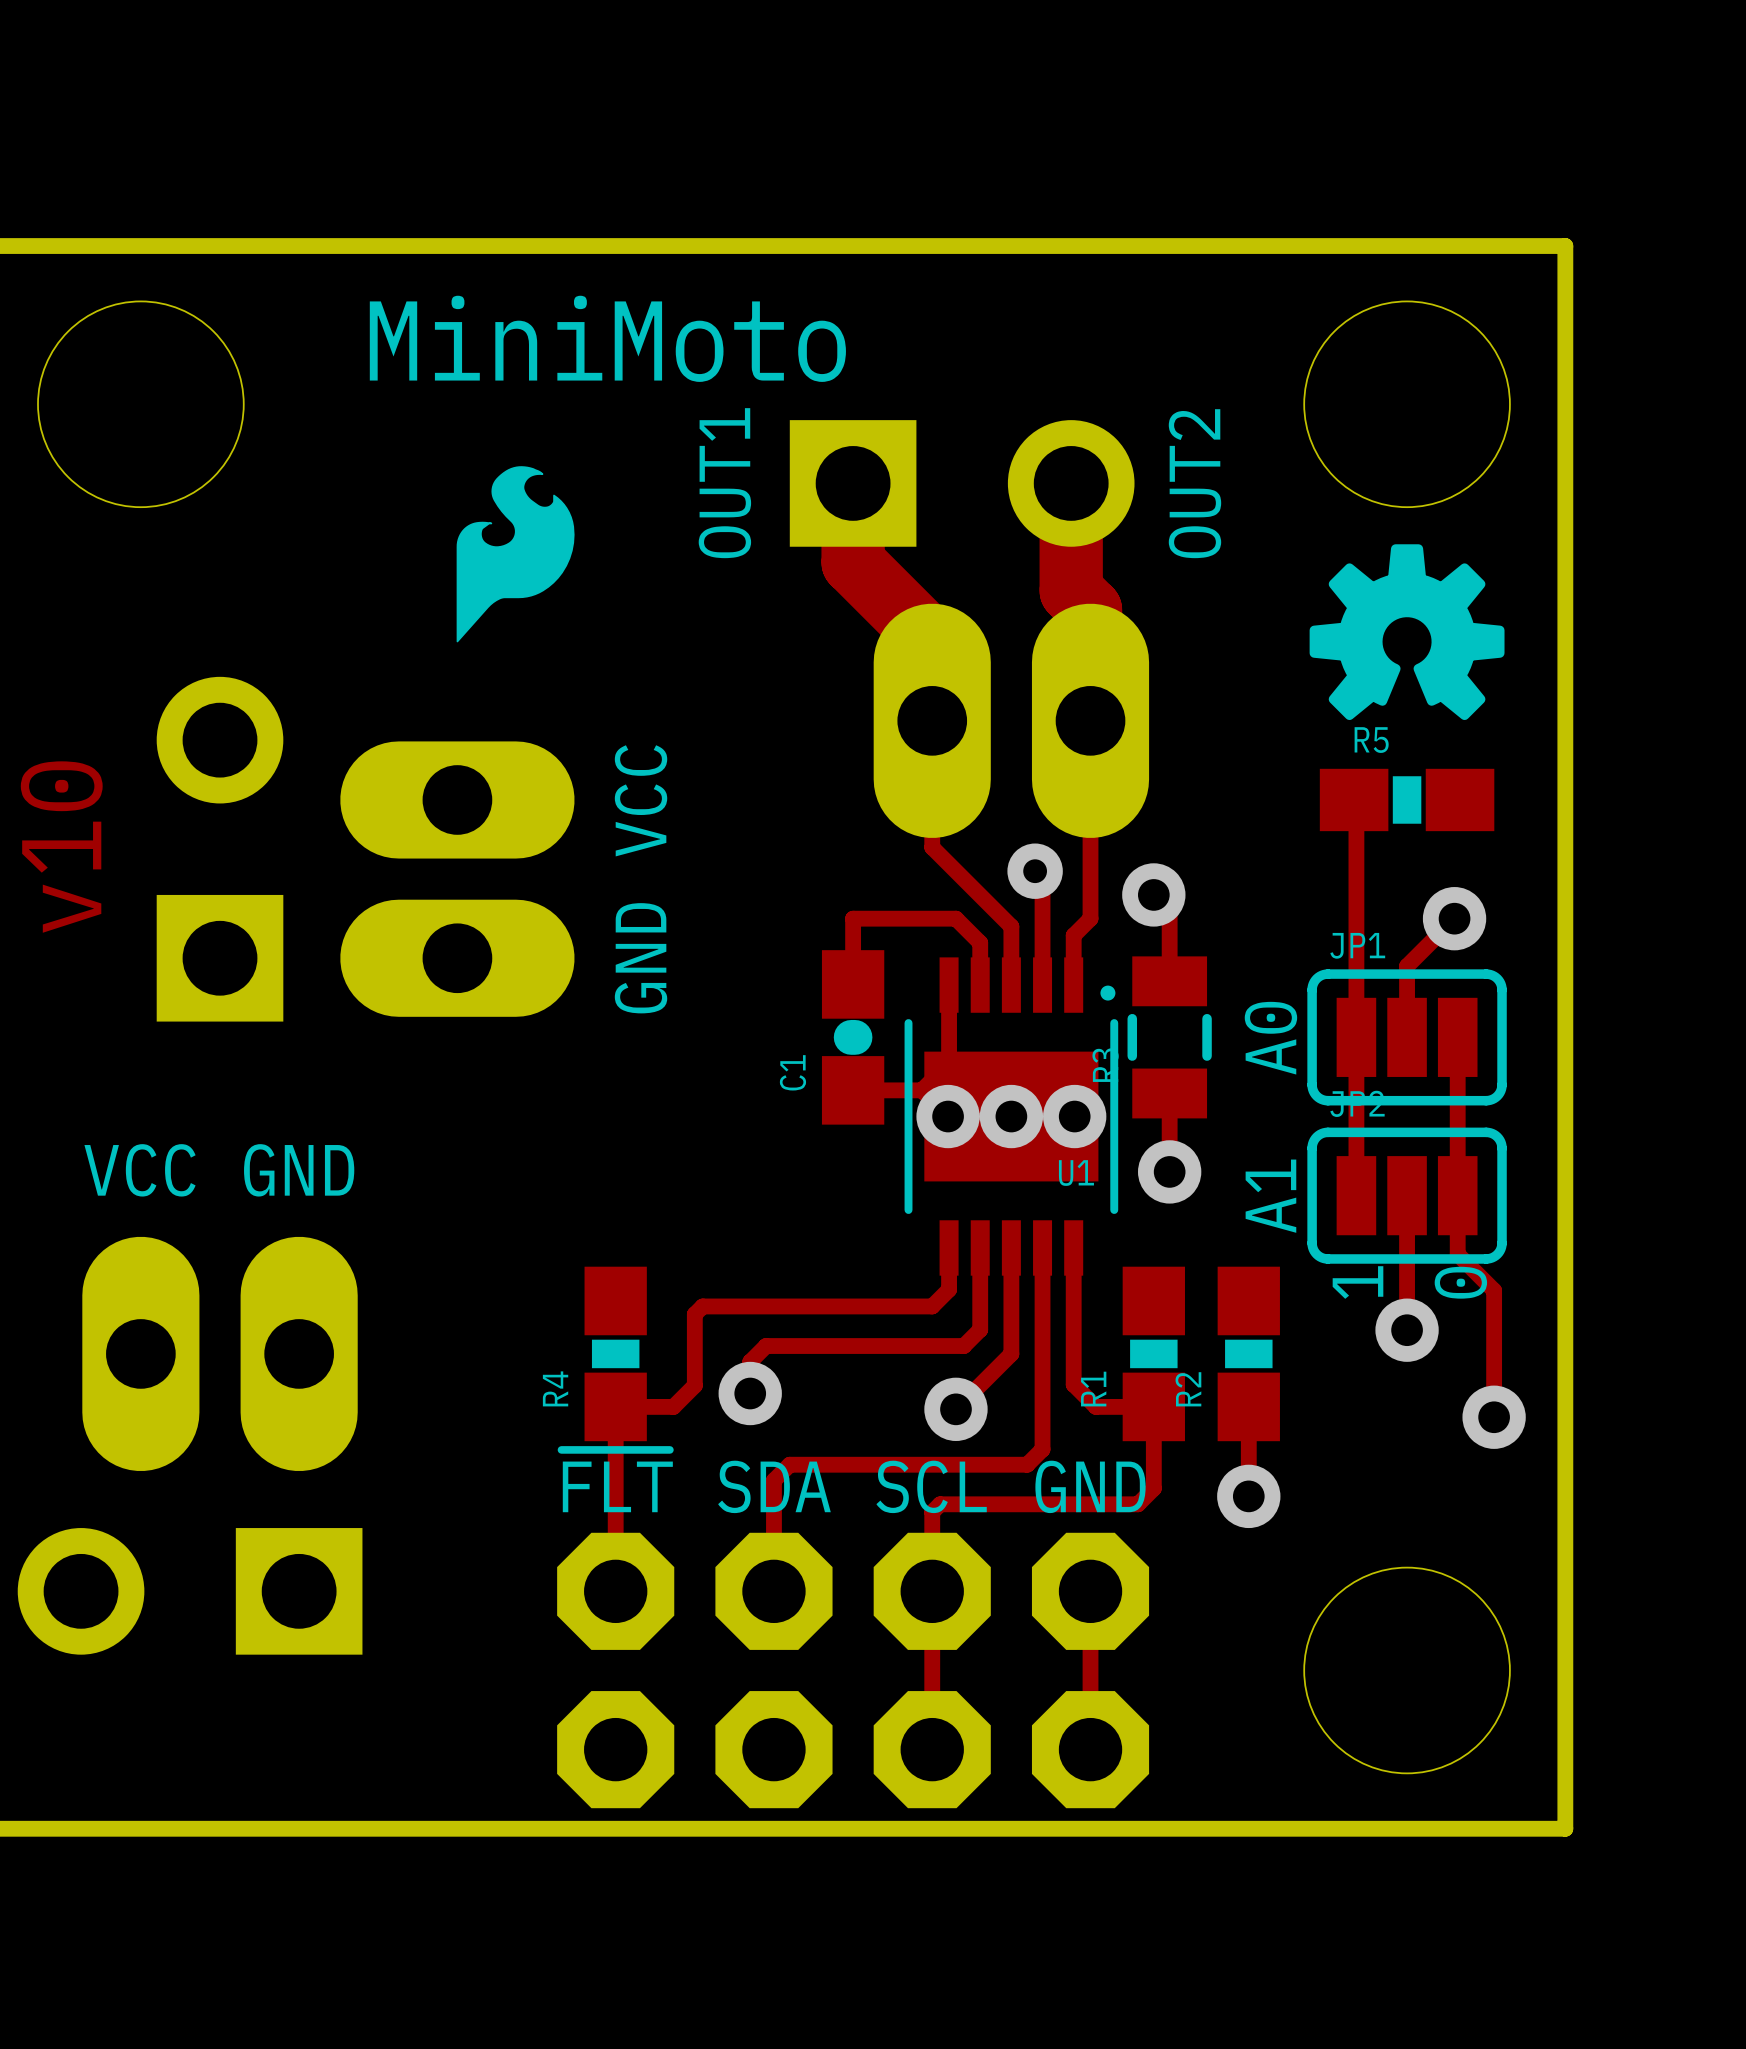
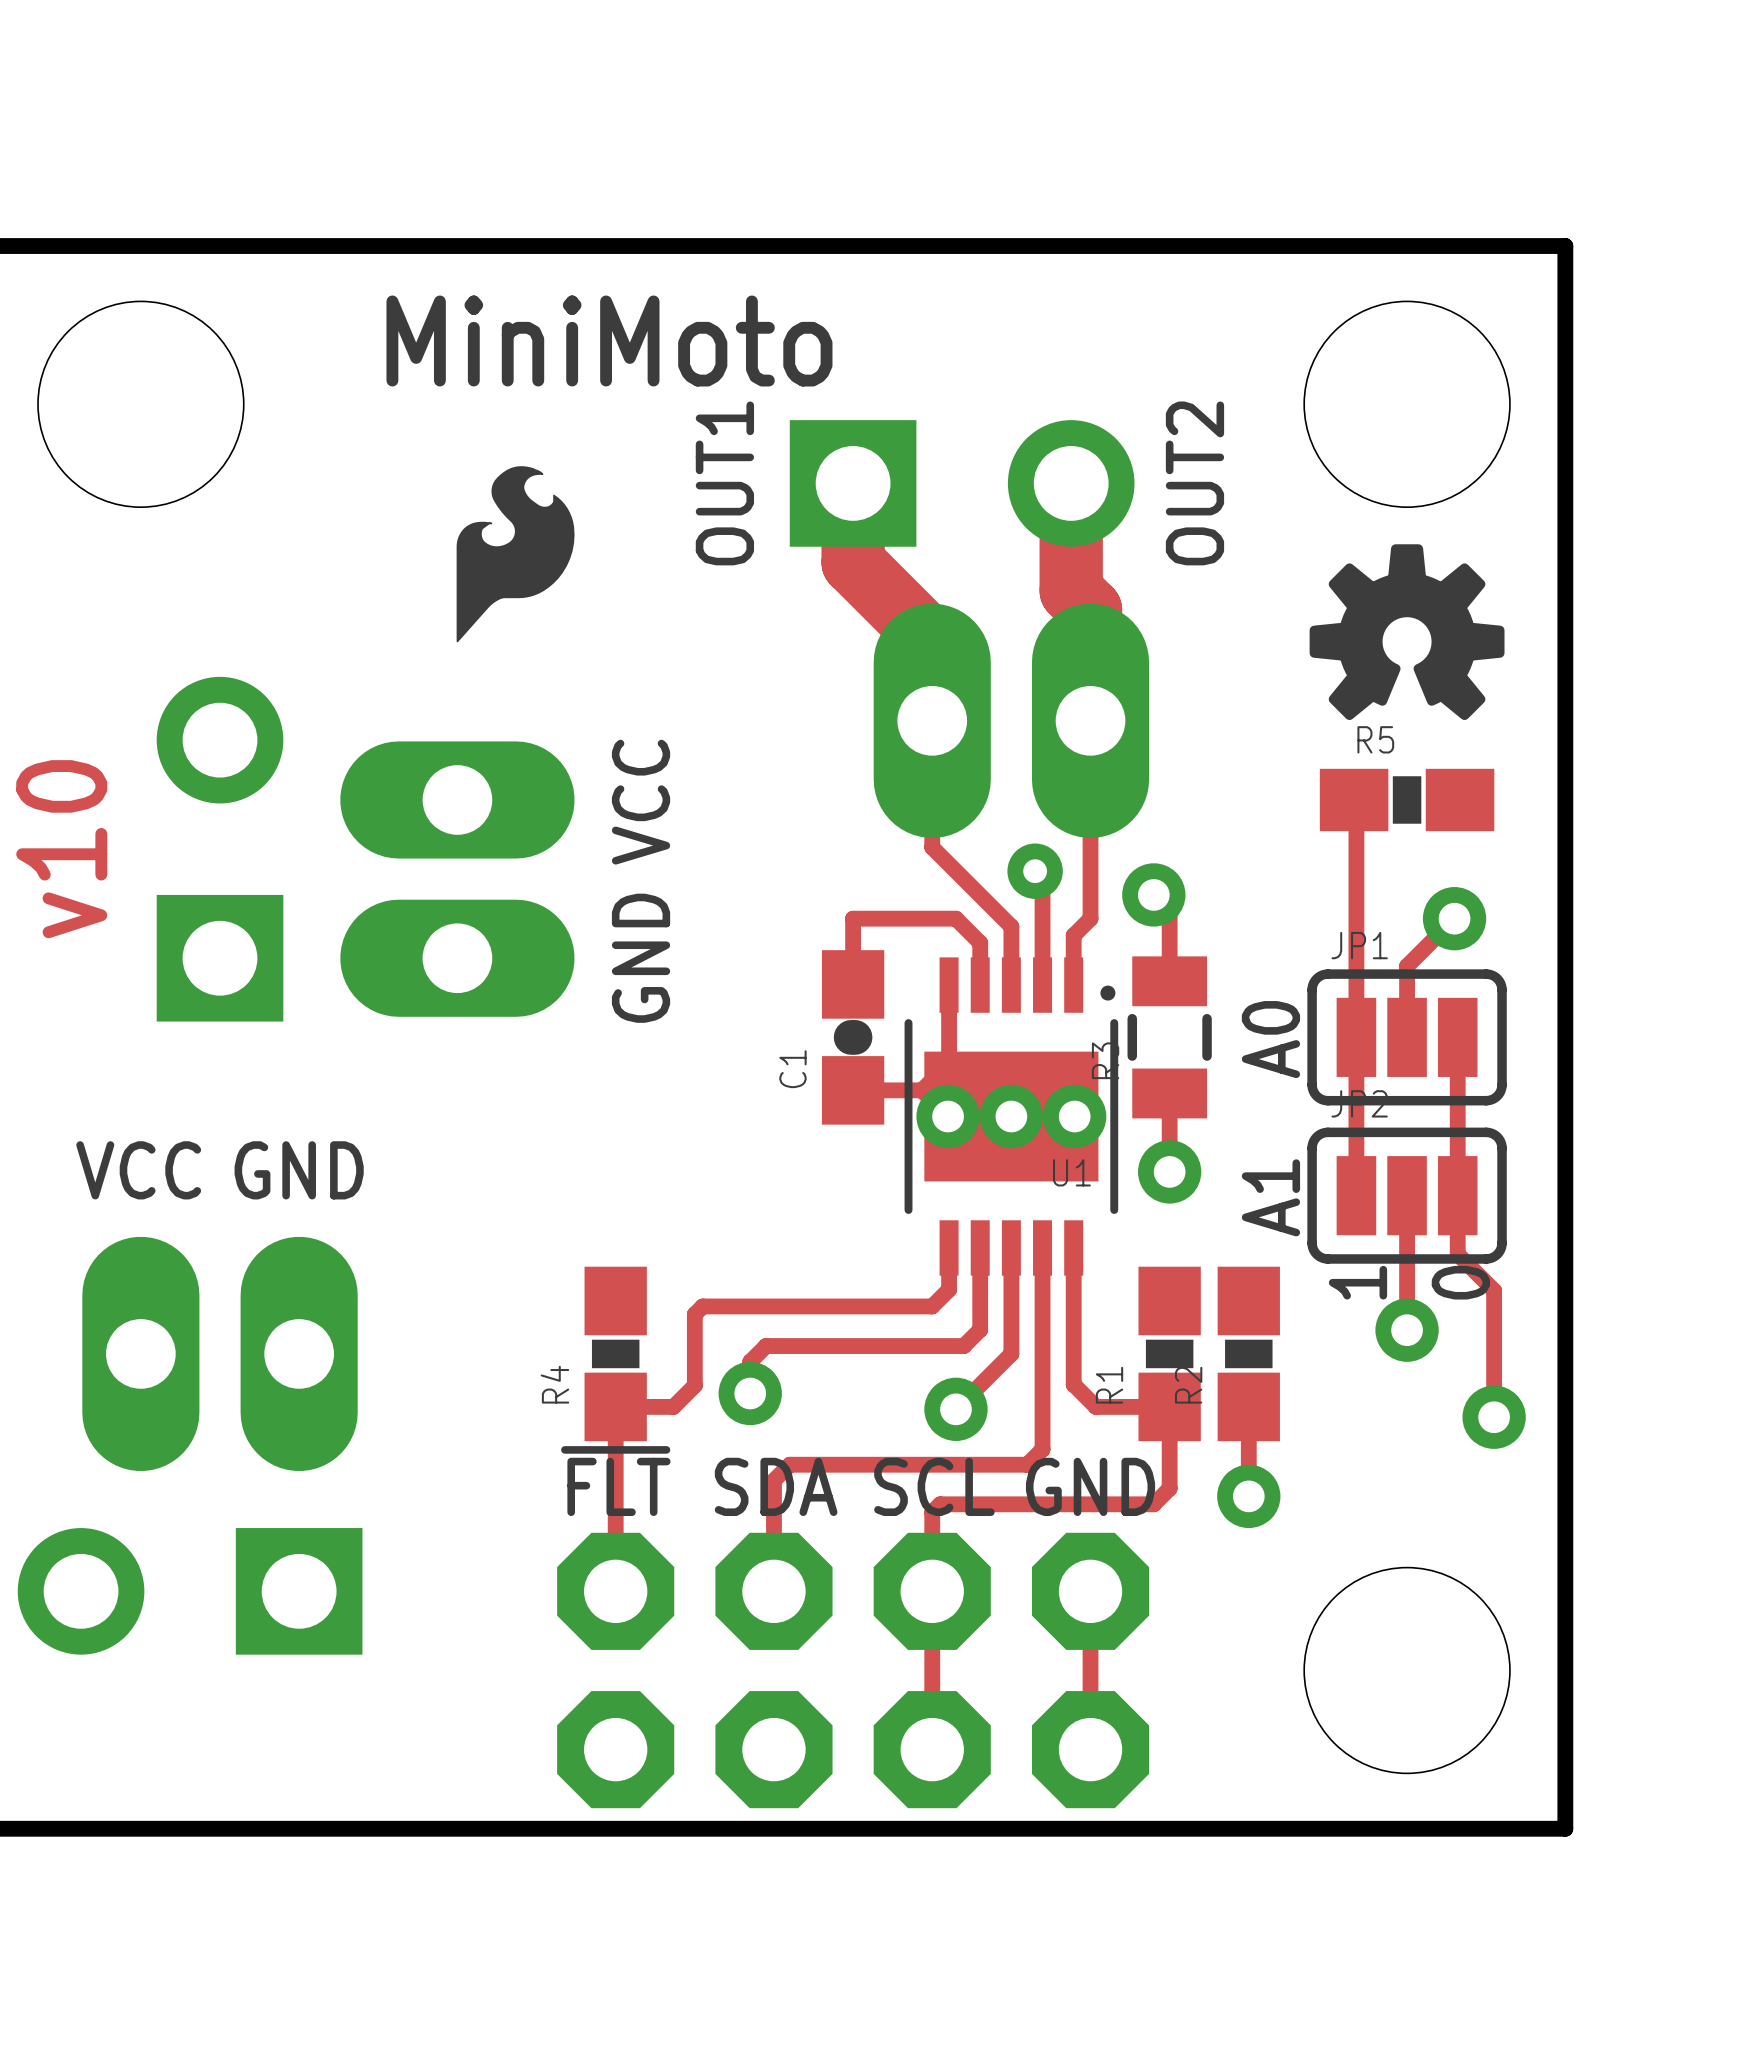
R1 position: (1153, 1353) -> (1169, 1353)
track: (1153, 1406) (1153, 1488) (1138, 1504) -> (1153, 1406) (1169, 1406) (1169, 1488) (1153, 1504) (1138, 1504)

